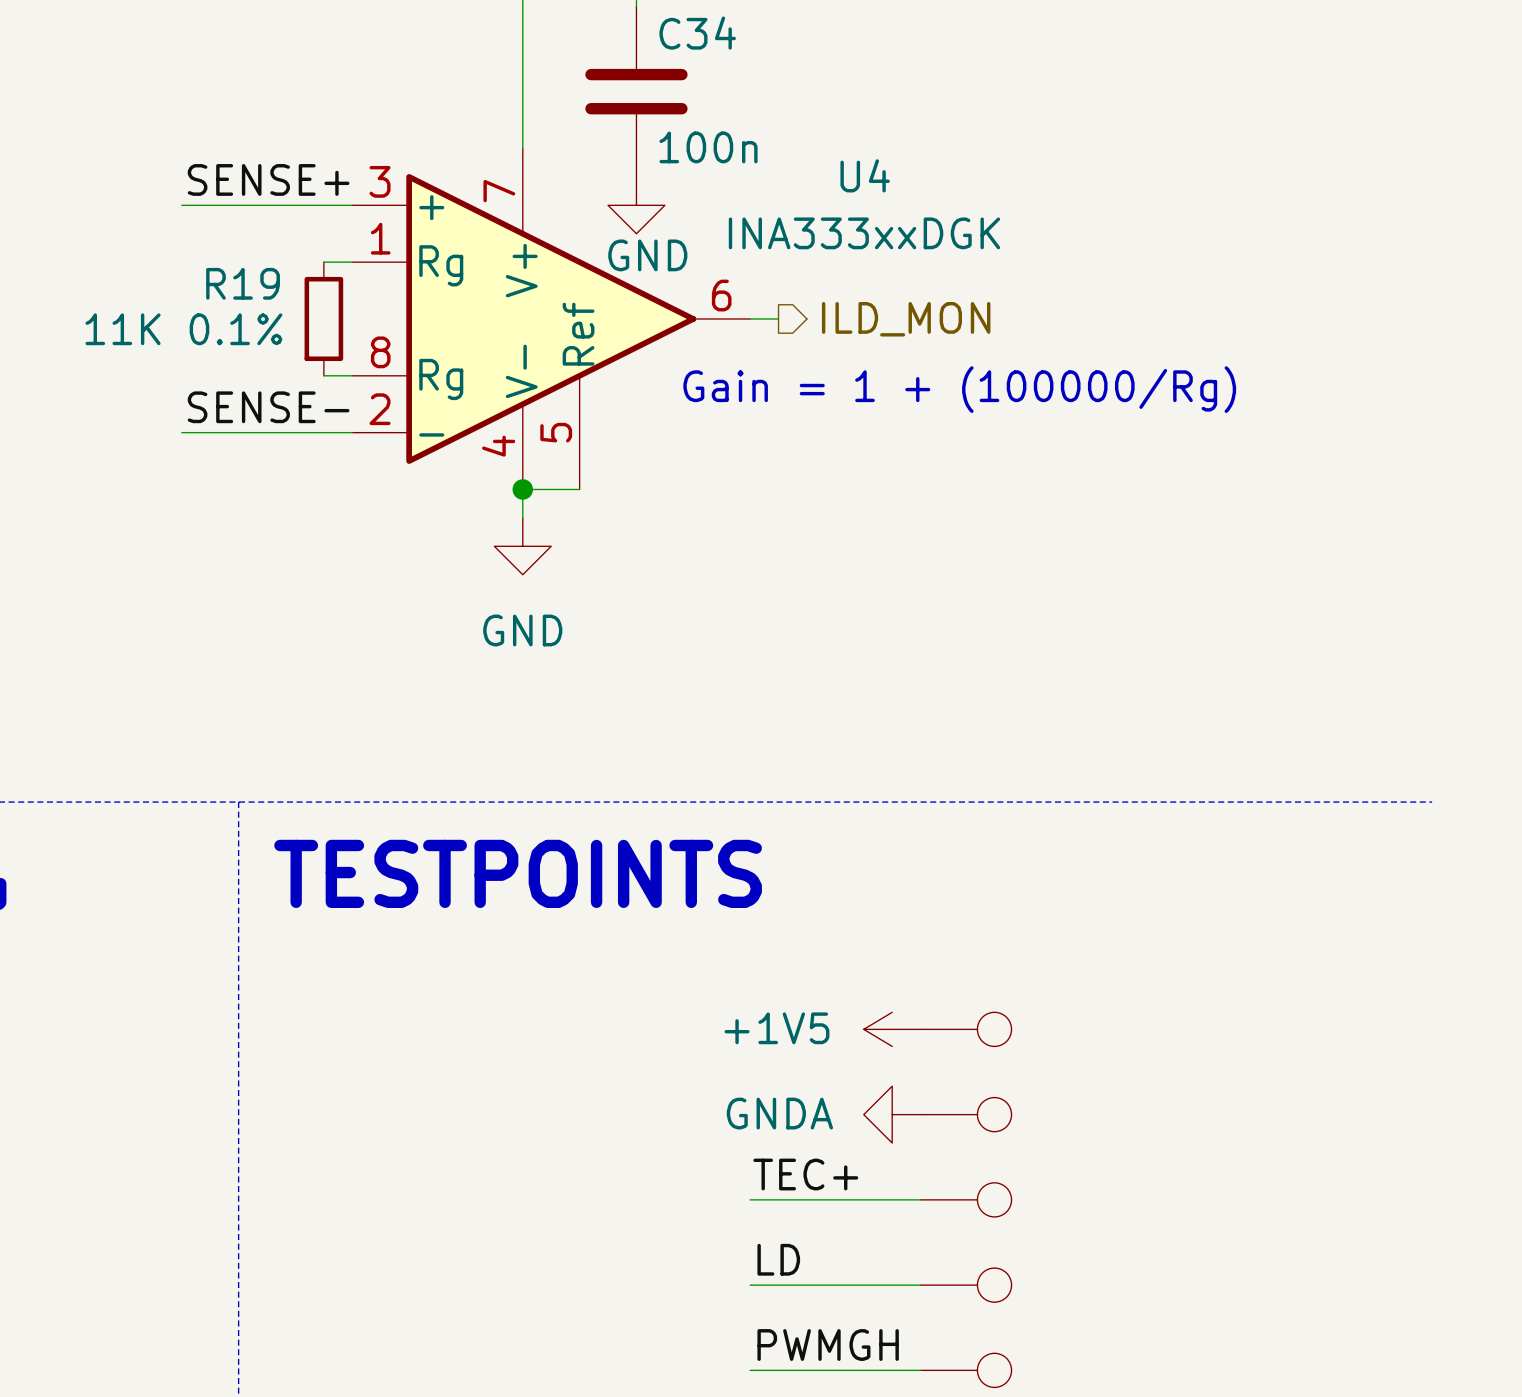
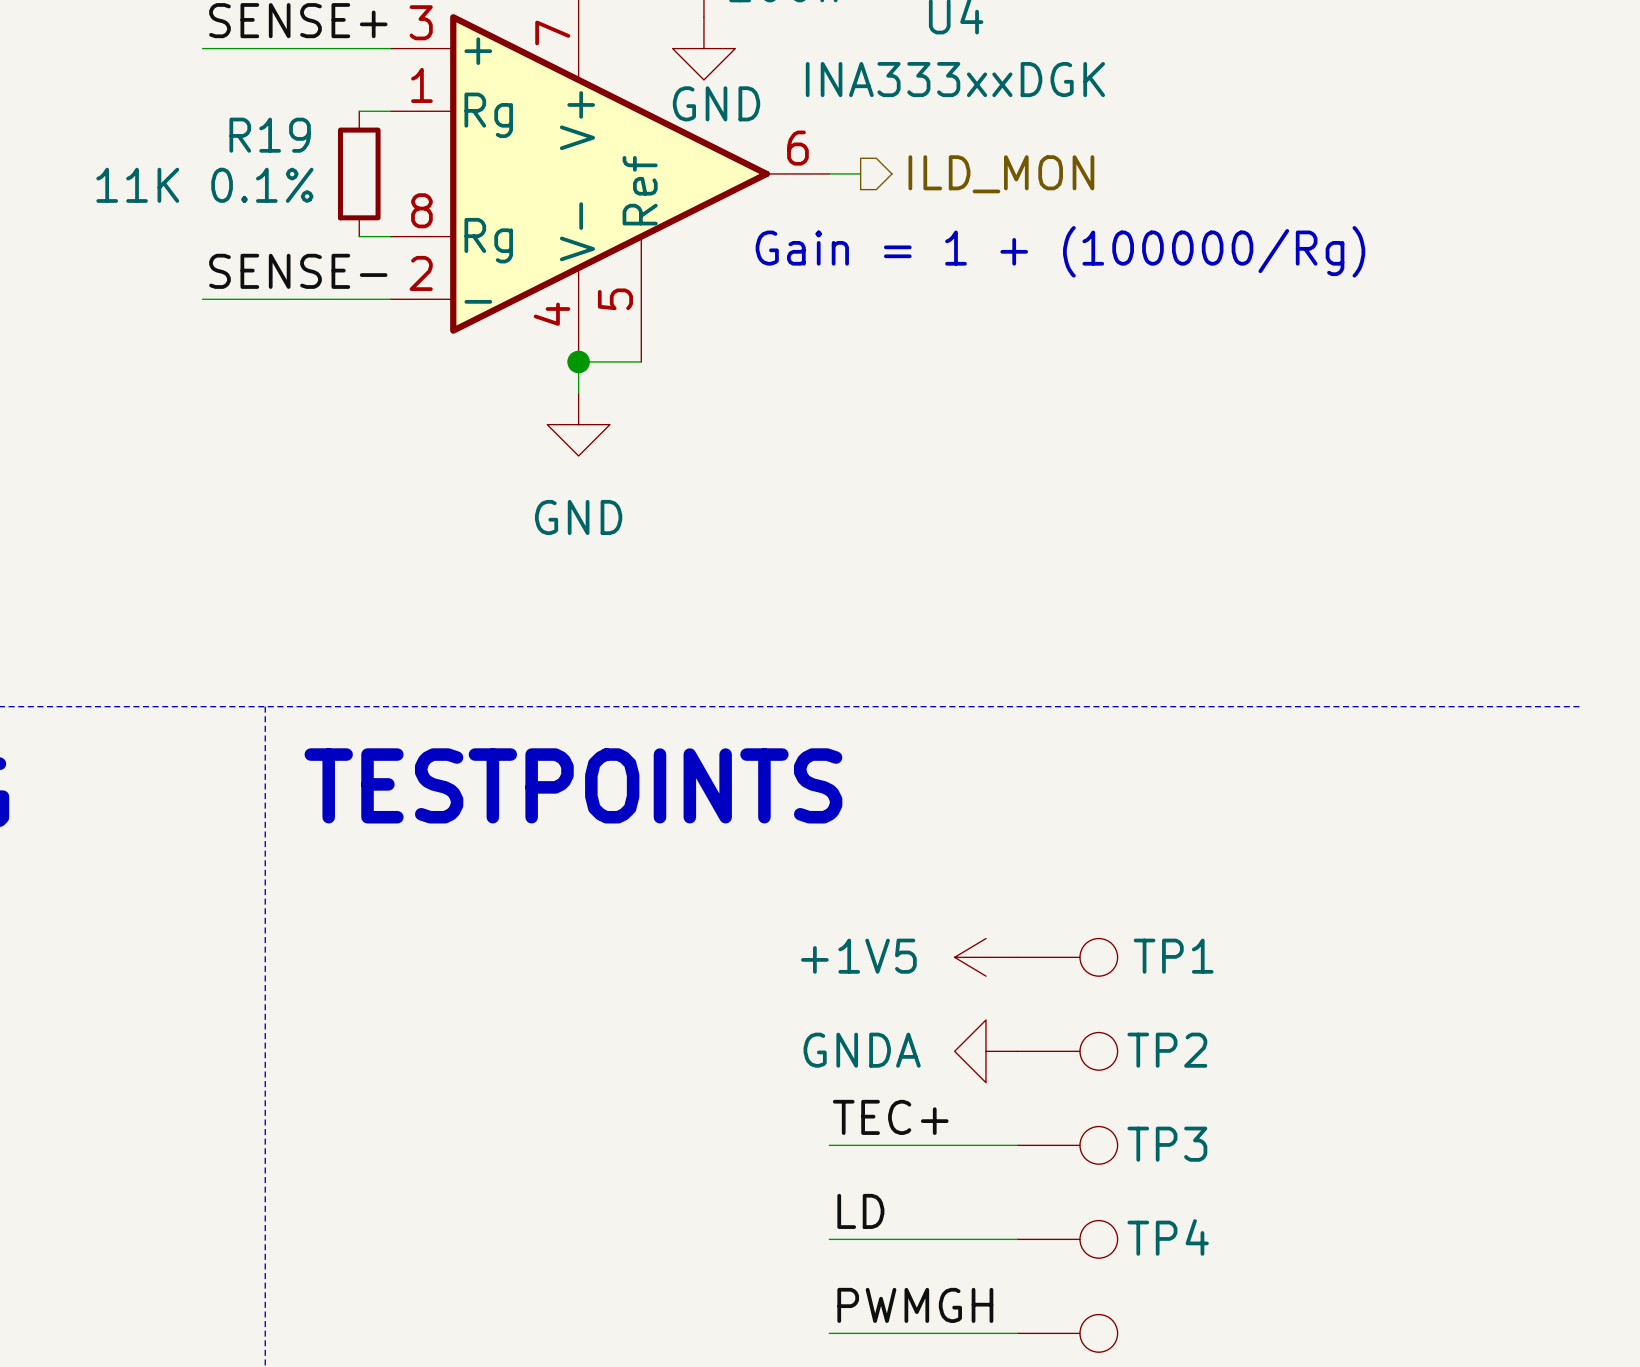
TP1 name: none -> TP1 (1173, 956)
TP2 name: none -> TP2 (1167, 1050)
TP3 name: none -> TP3 (1167, 1144)
TP4 name: none -> TP4 (1168, 1237)

